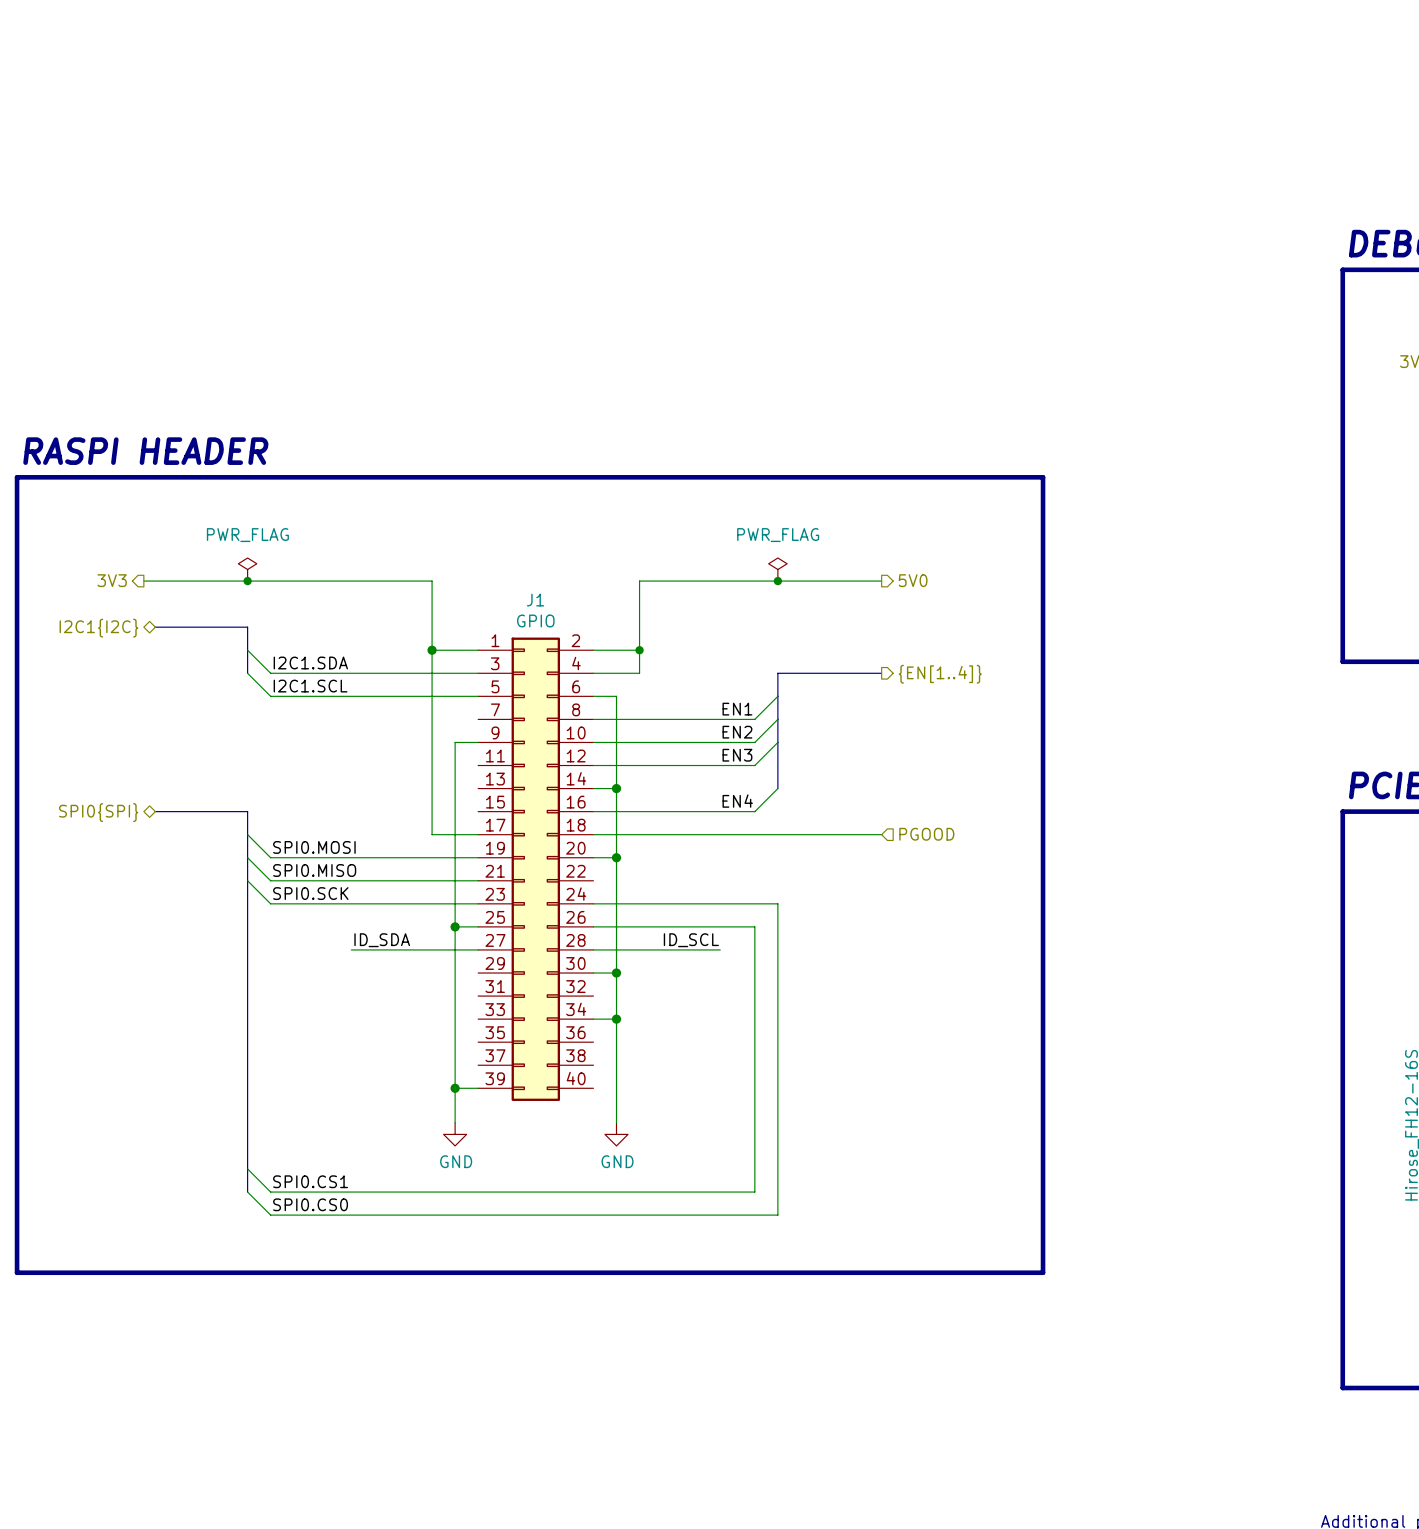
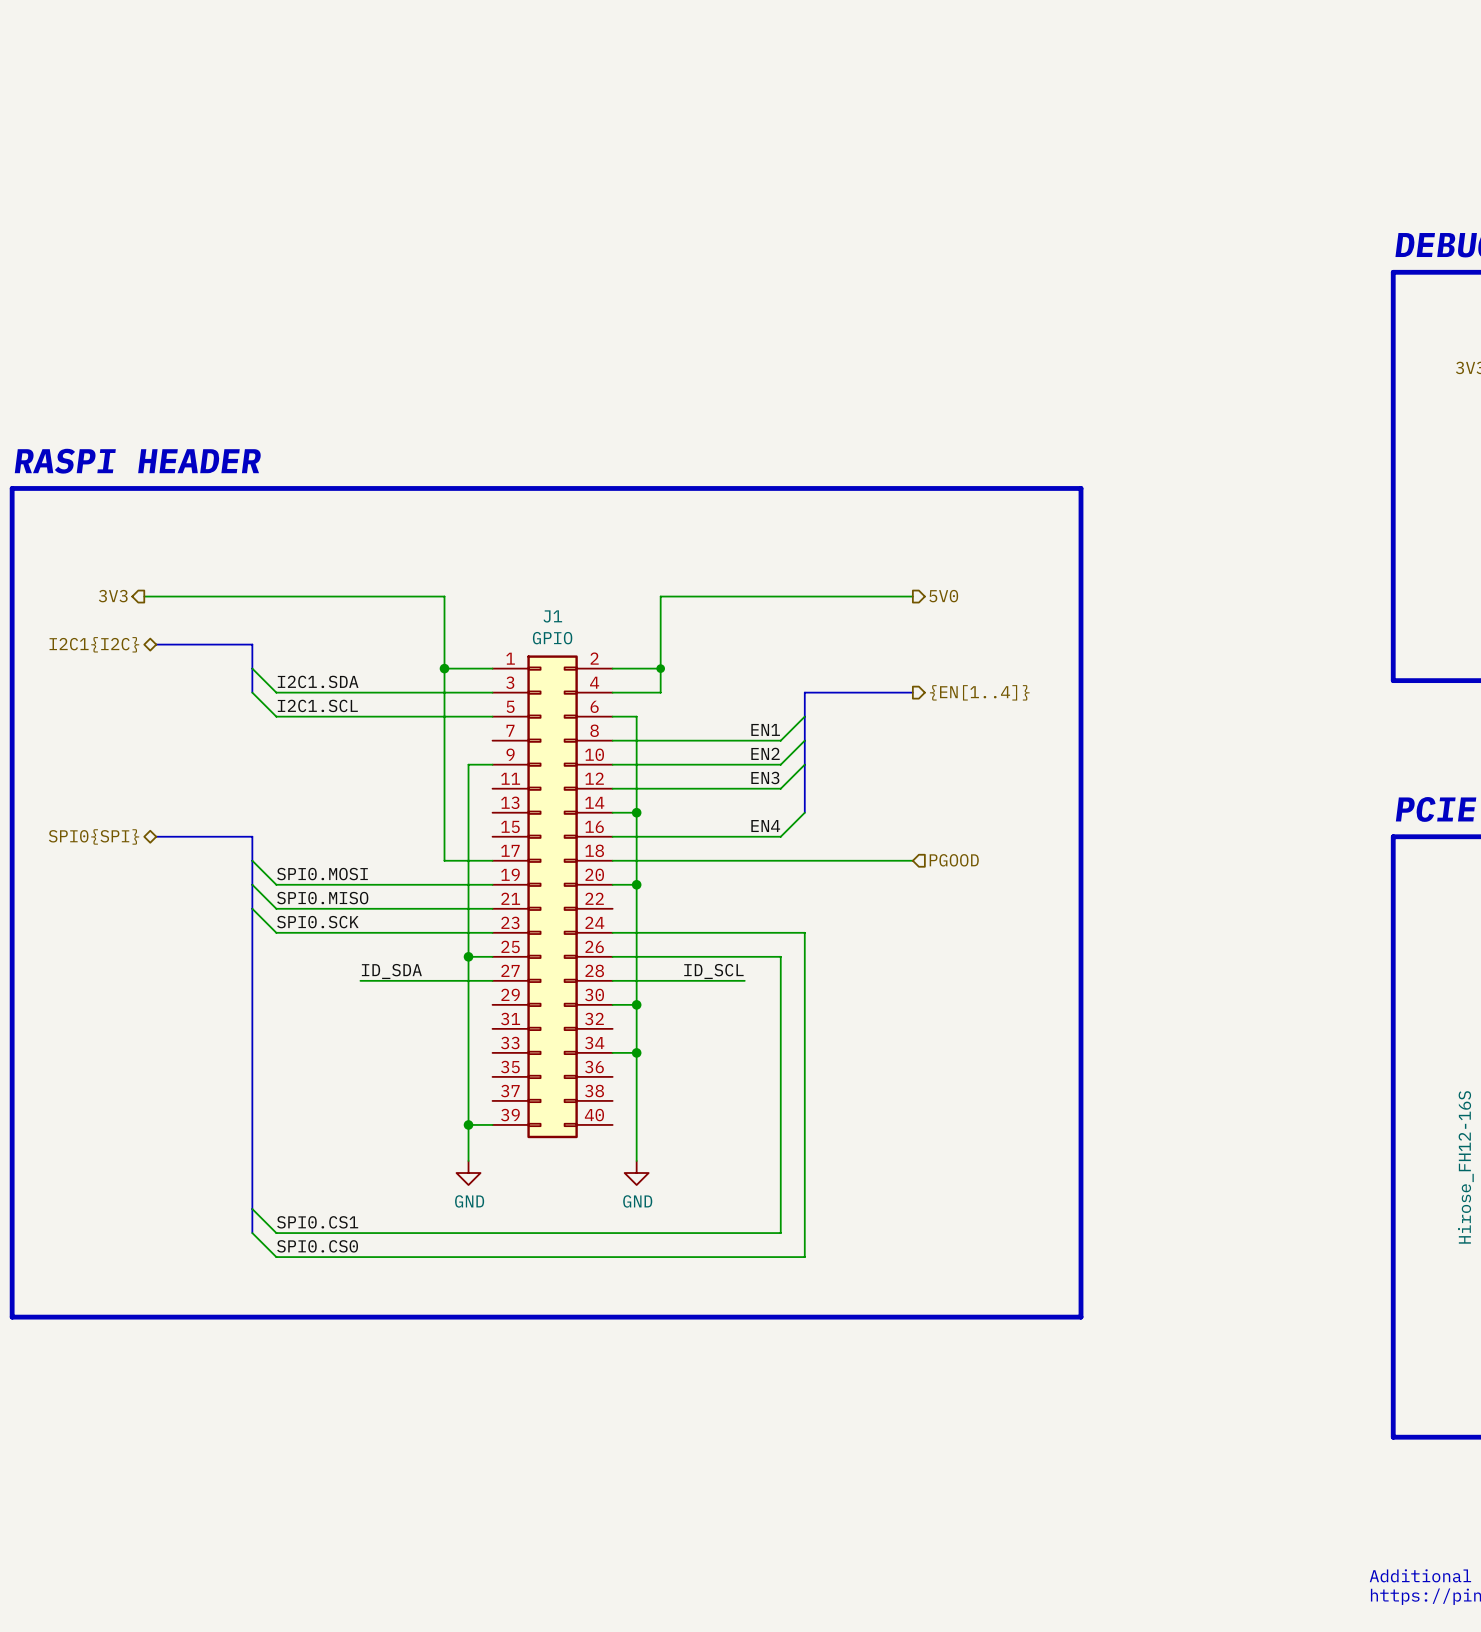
power symbol: PWR_FLAG (247, 569) -> none
power symbol: PWR_FLAG (777, 569) -> none
junction: (247, 581) -> none
junction: (777, 581) -> none

